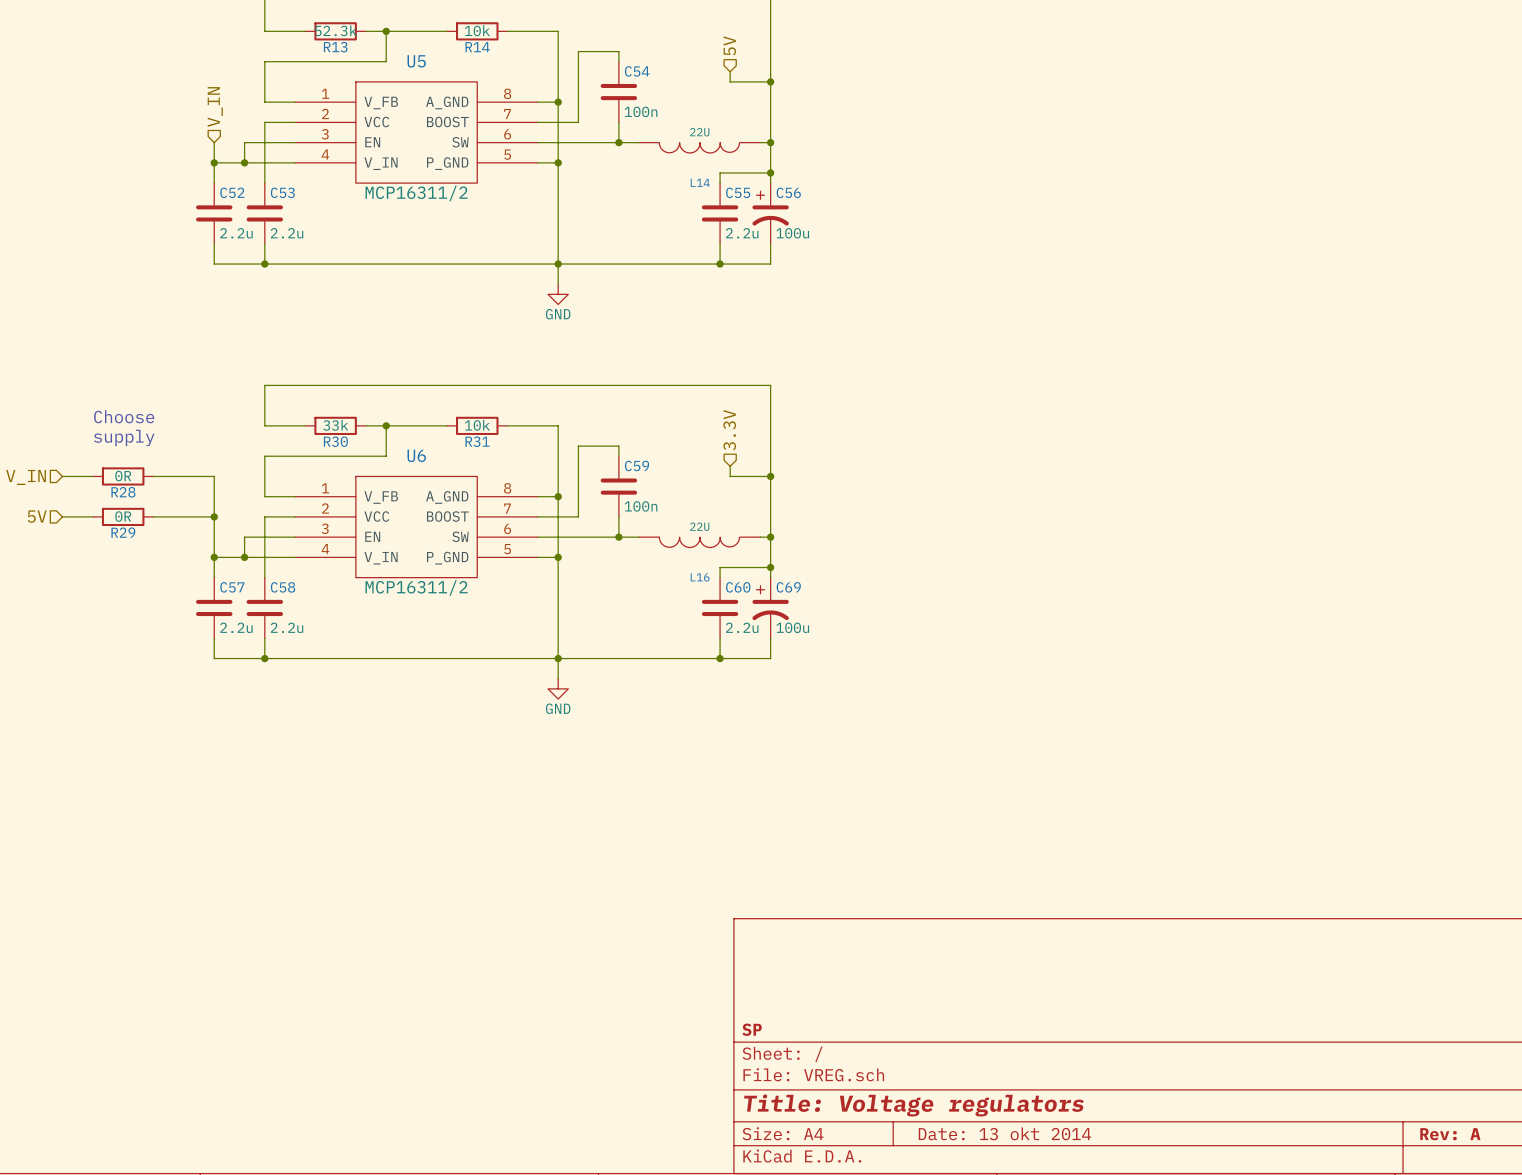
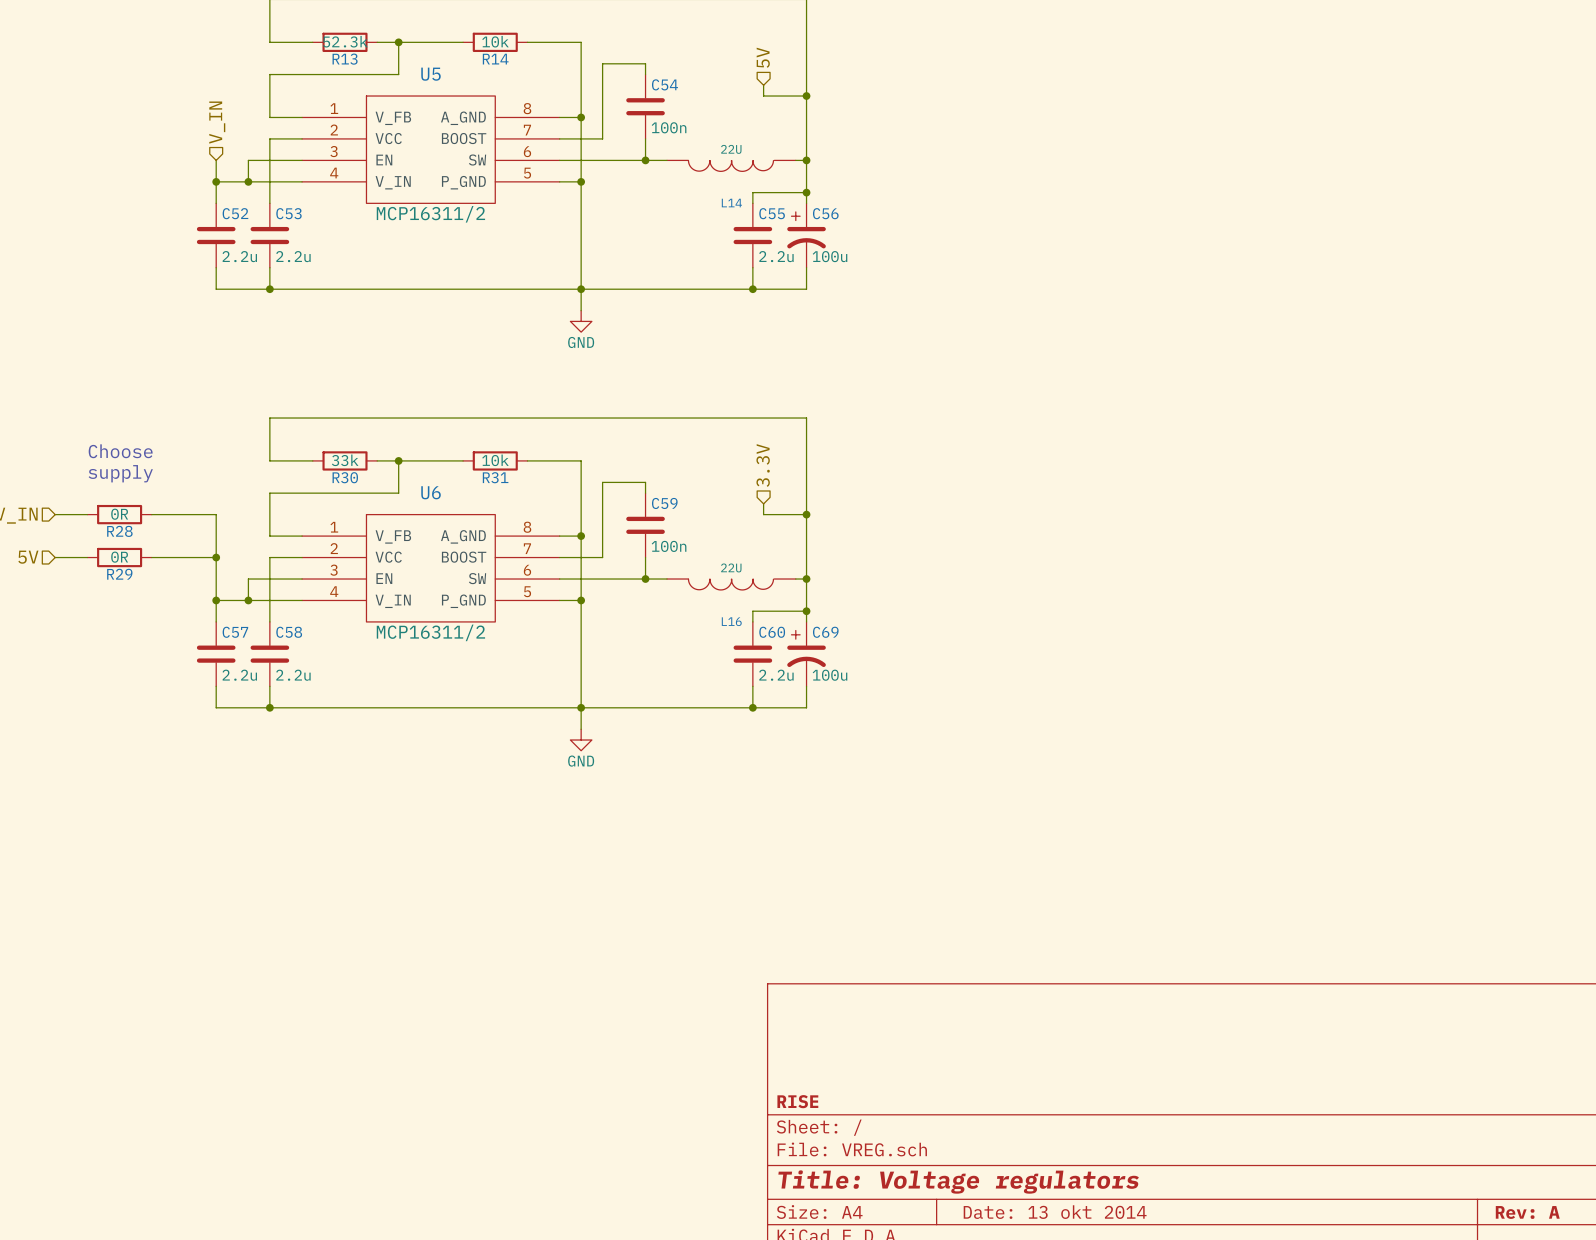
title block: SP (752, 1029) -> RISE (797, 1101)

